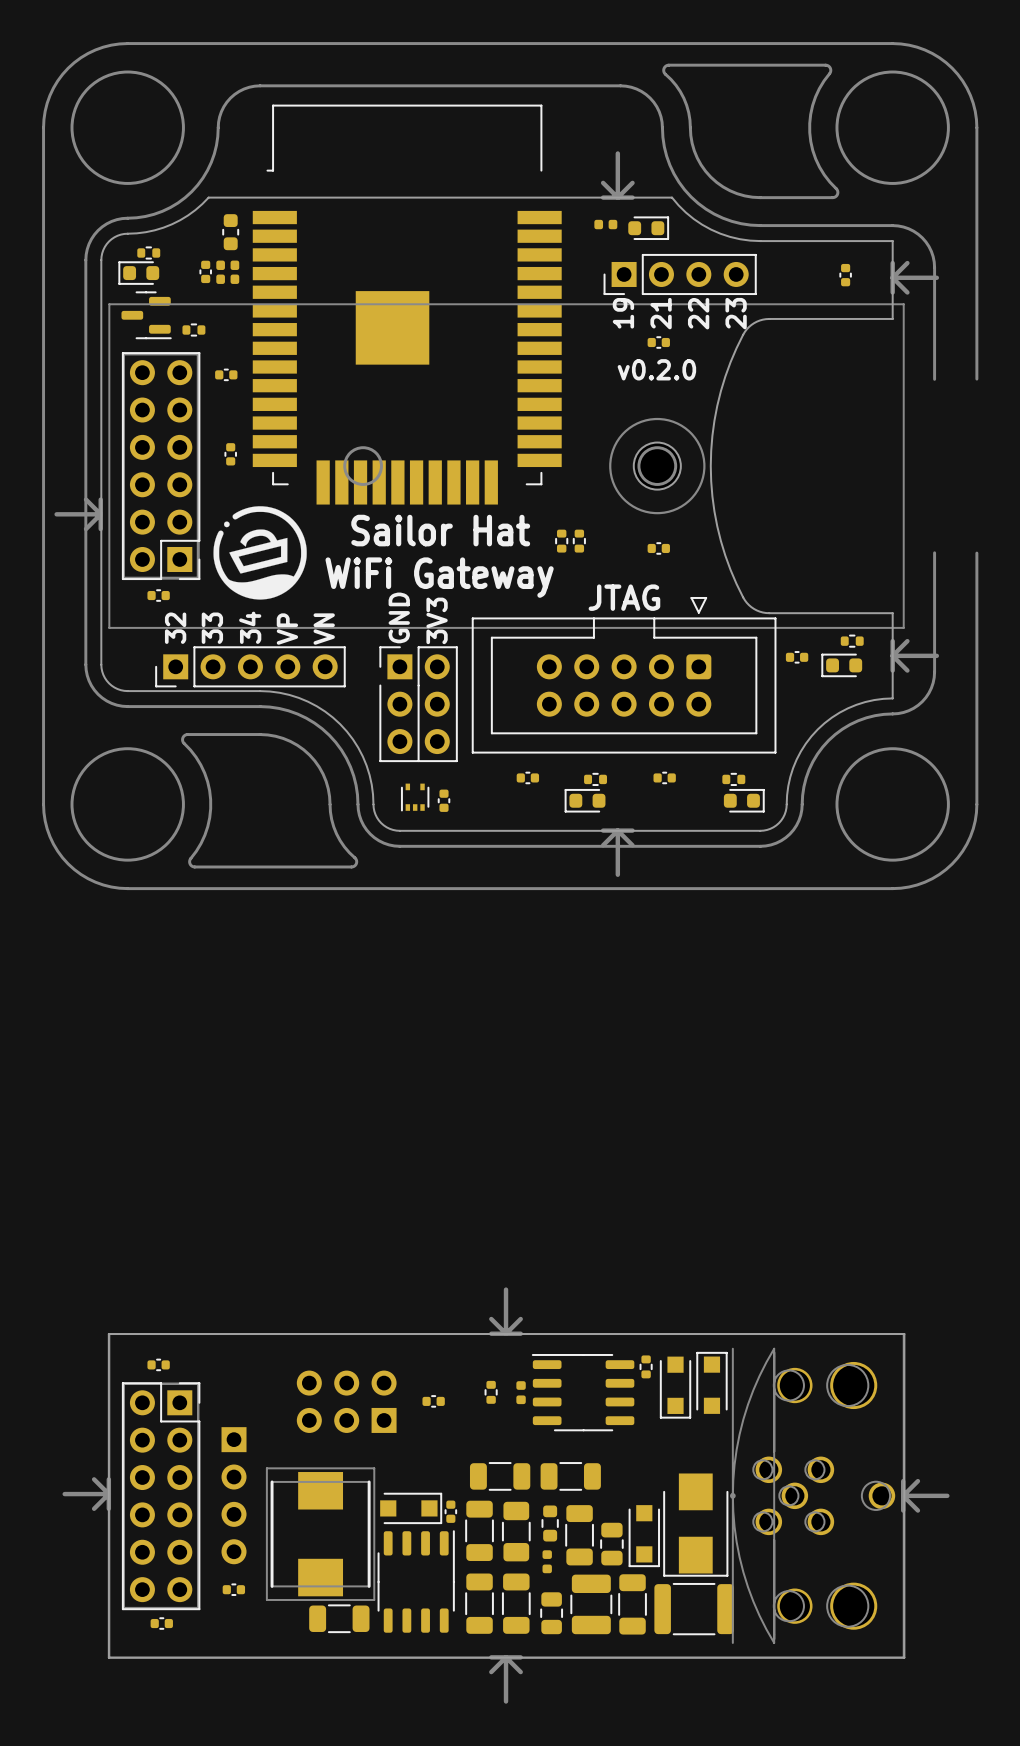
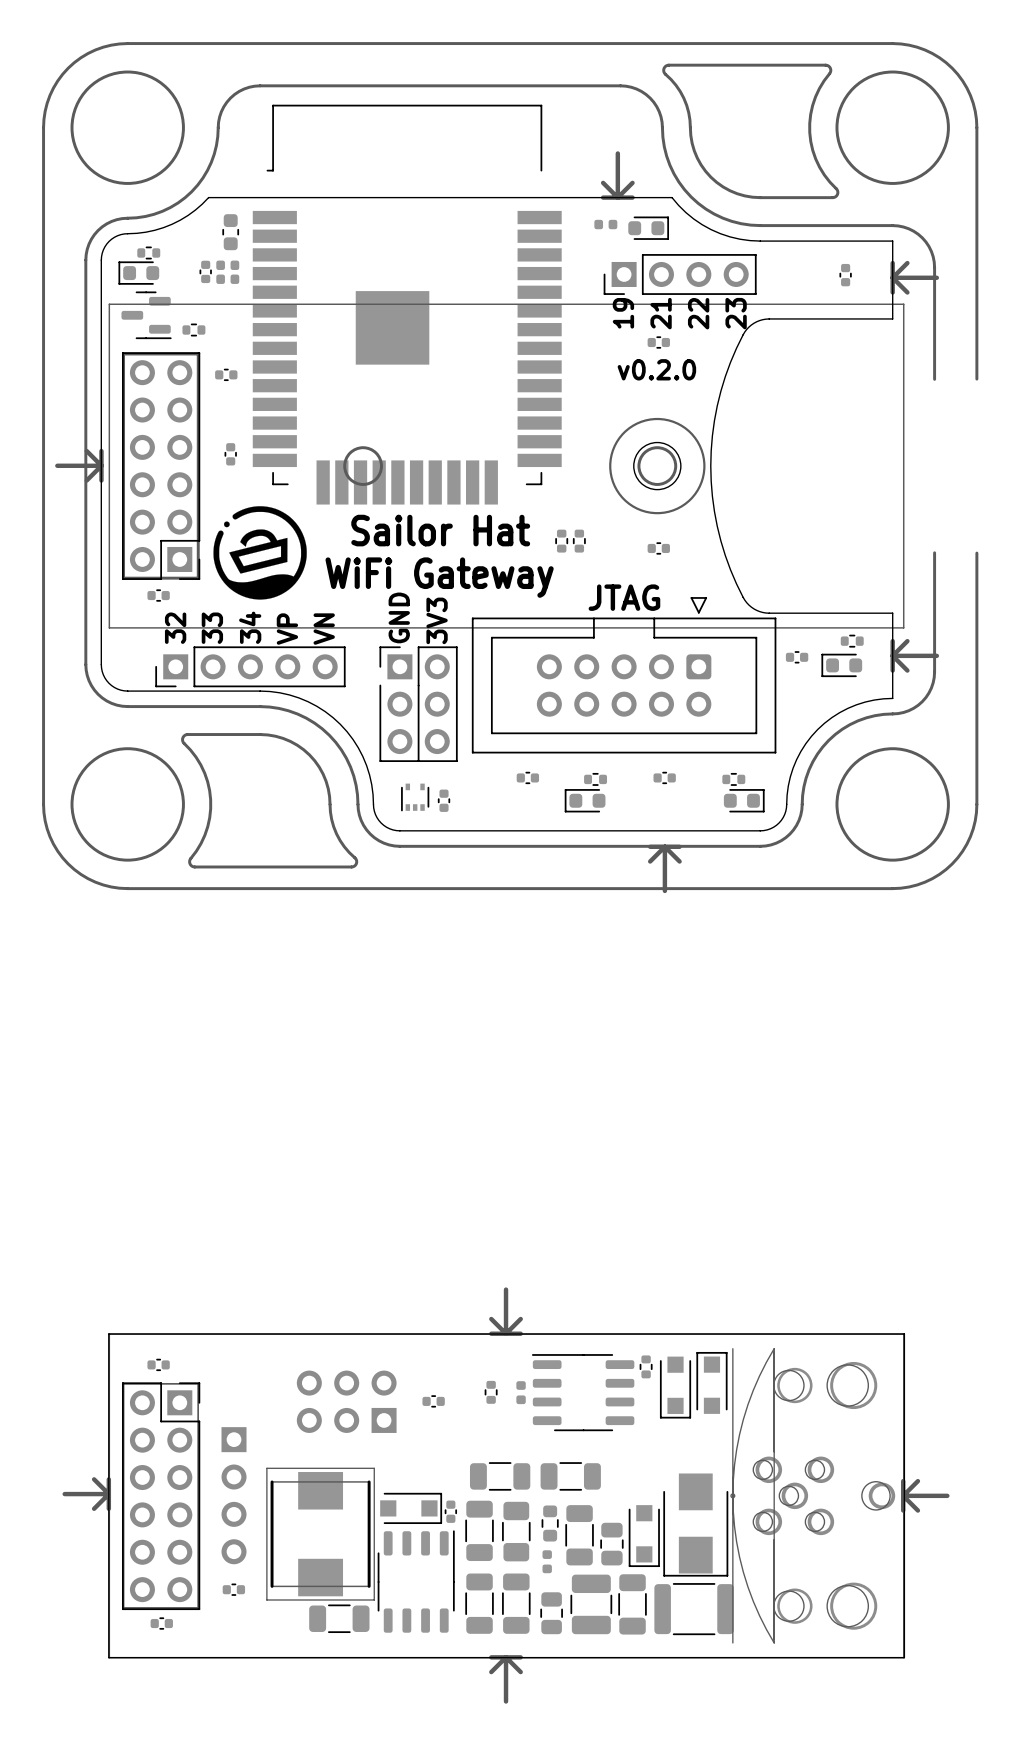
drawing position: (78, 514) -> (79, 465)
drawing position: (617, 852) -> (664, 868)

